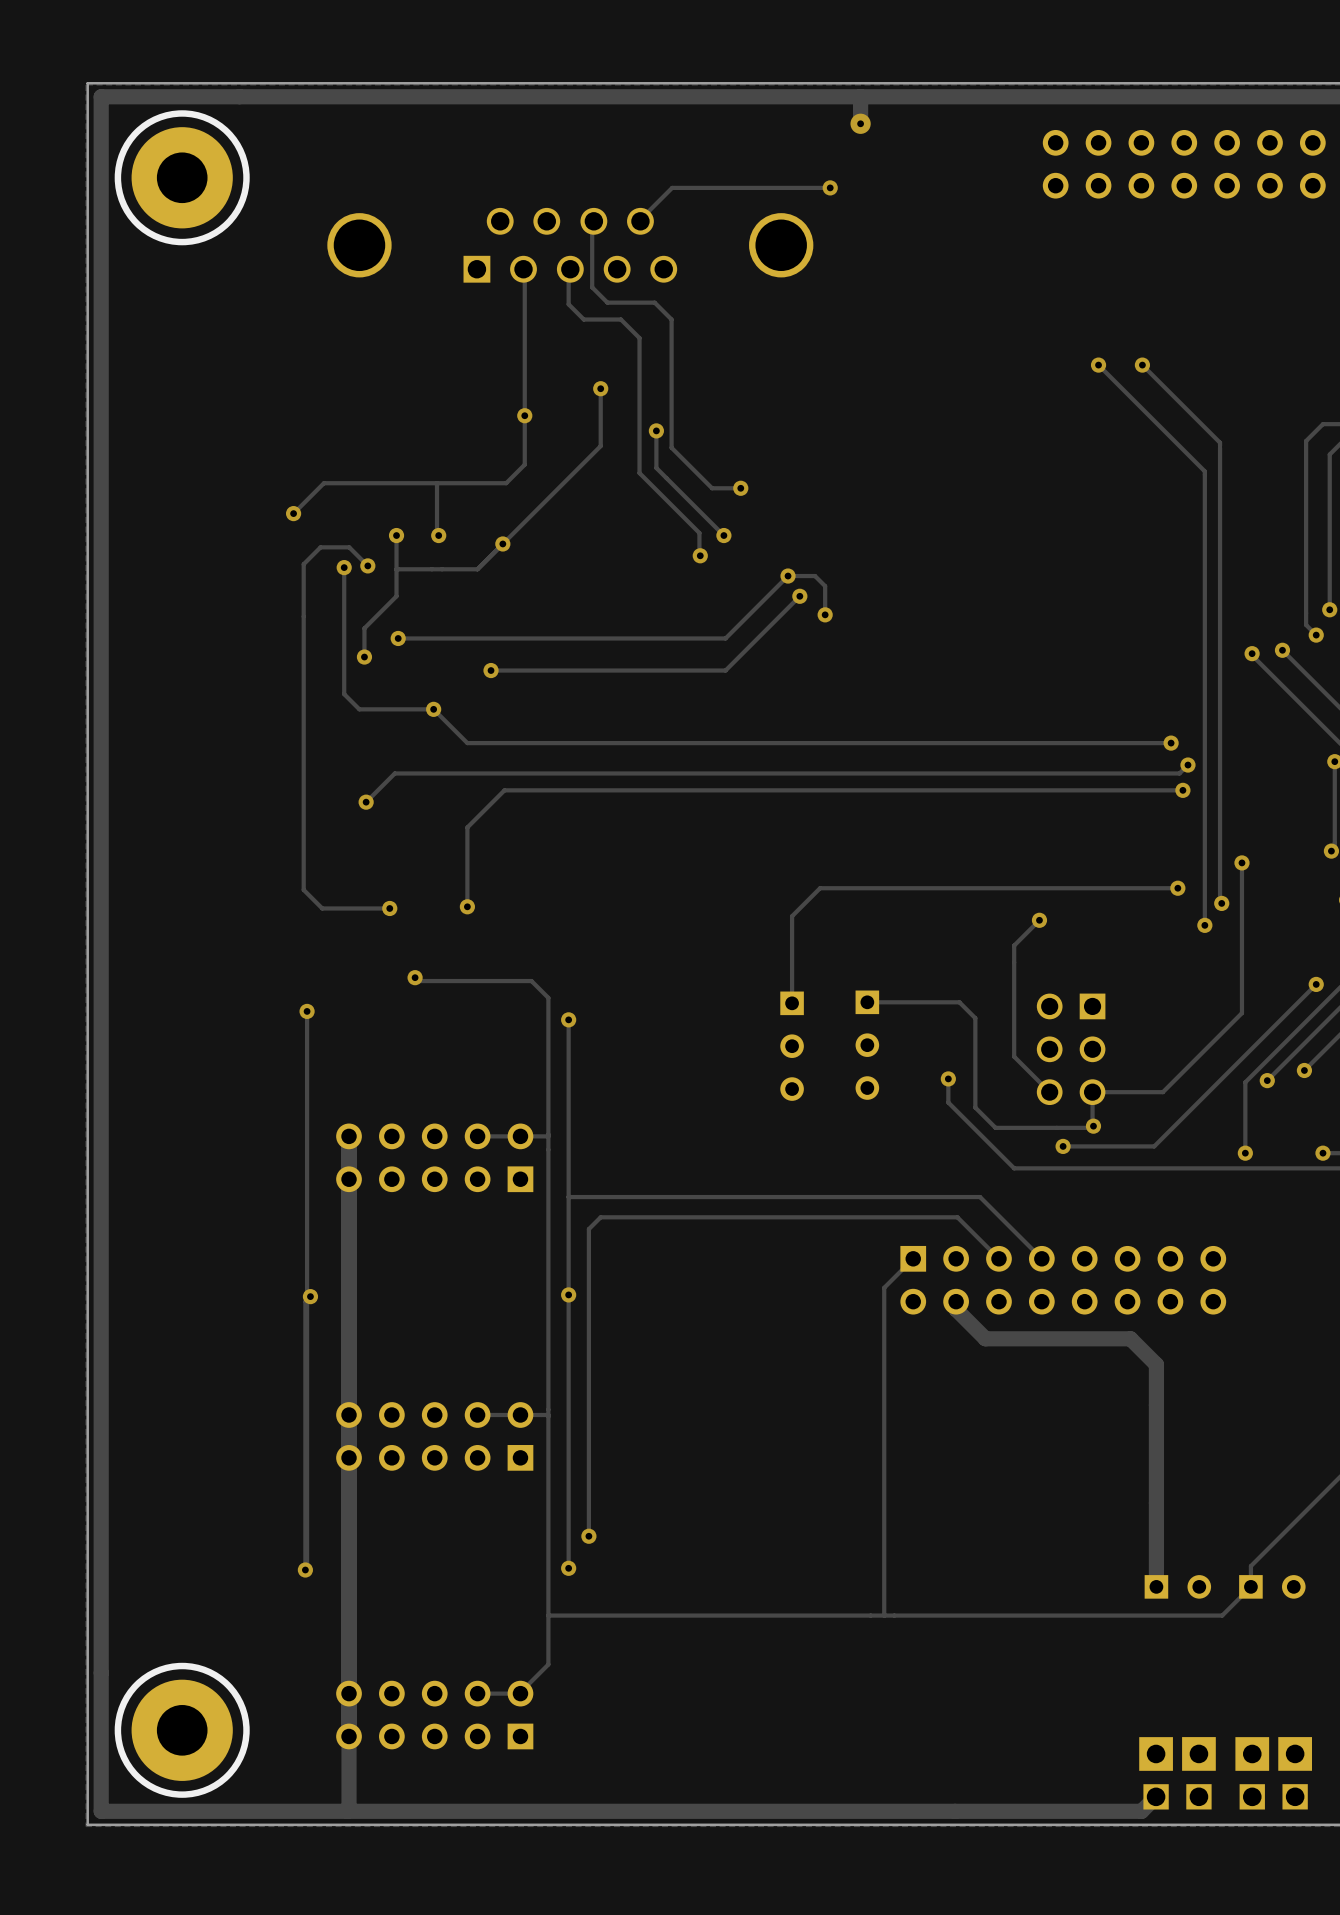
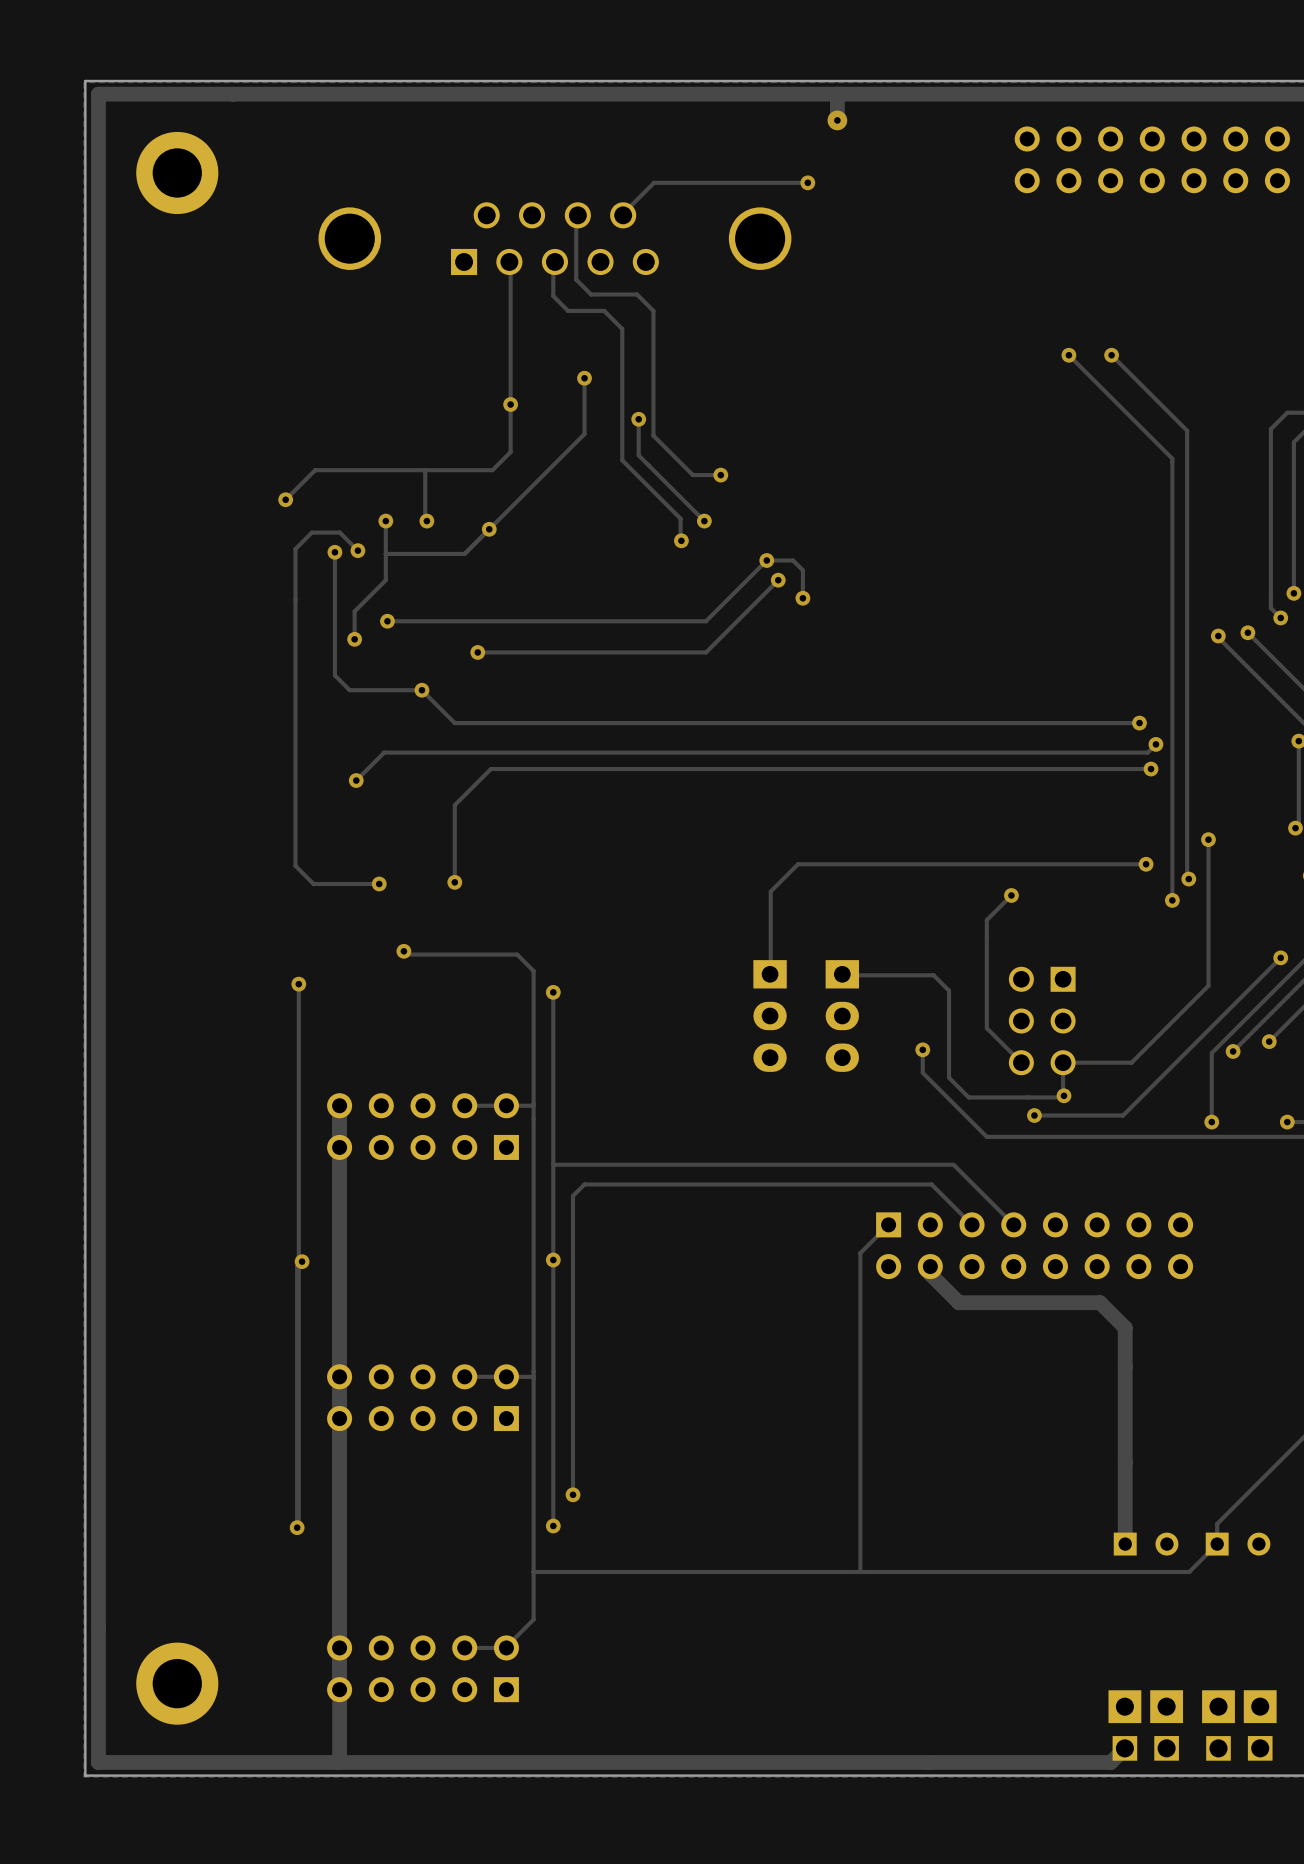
part footprint: [114, 110, 250, 246] -> [136, 131, 219, 215]
part footprint: [855, 990, 880, 1100] -> [825, 960, 860, 1072]
part footprint: [780, 991, 804, 1101] -> [753, 960, 787, 1072]
part footprint: [114, 1662, 250, 1798] -> [136, 1642, 219, 1725]

